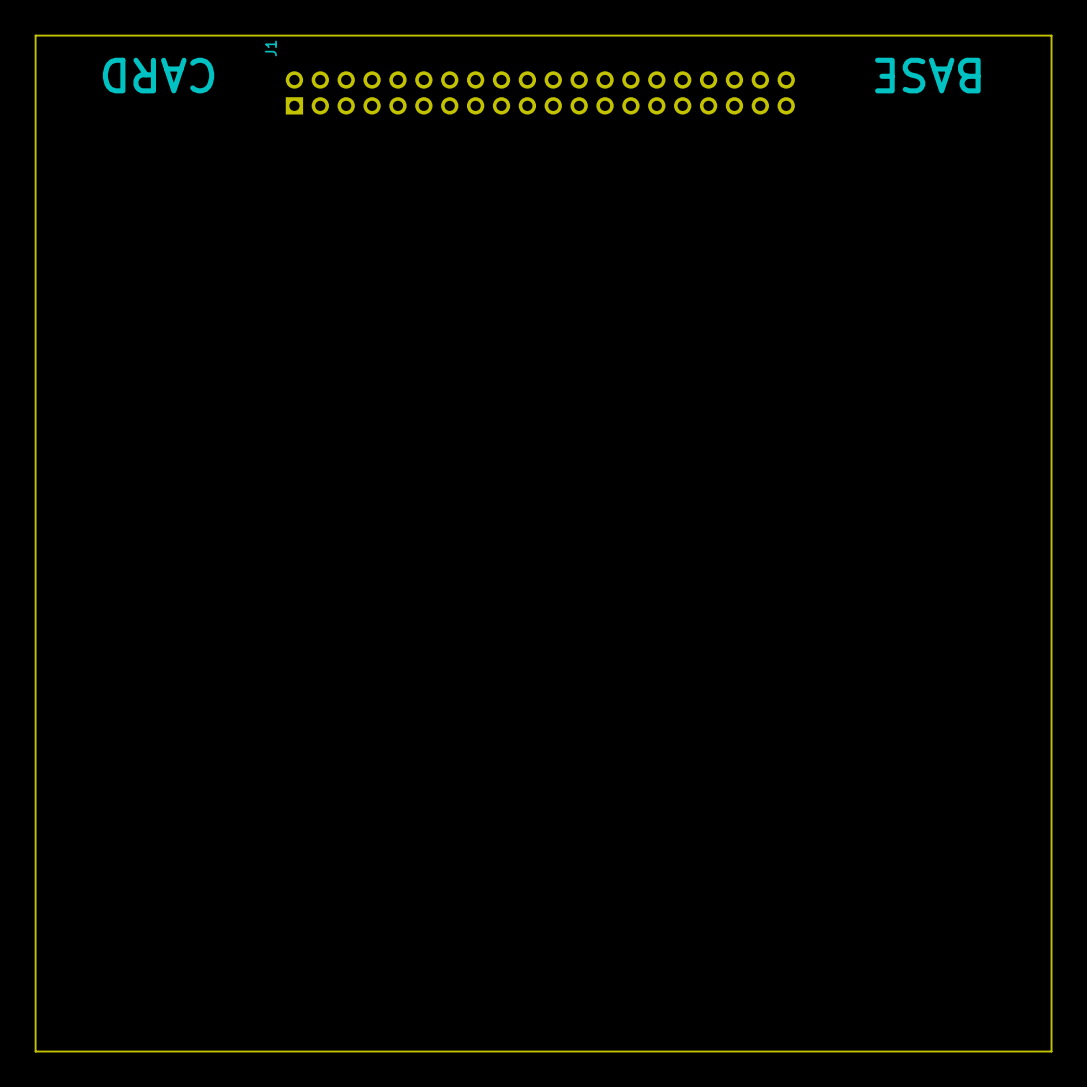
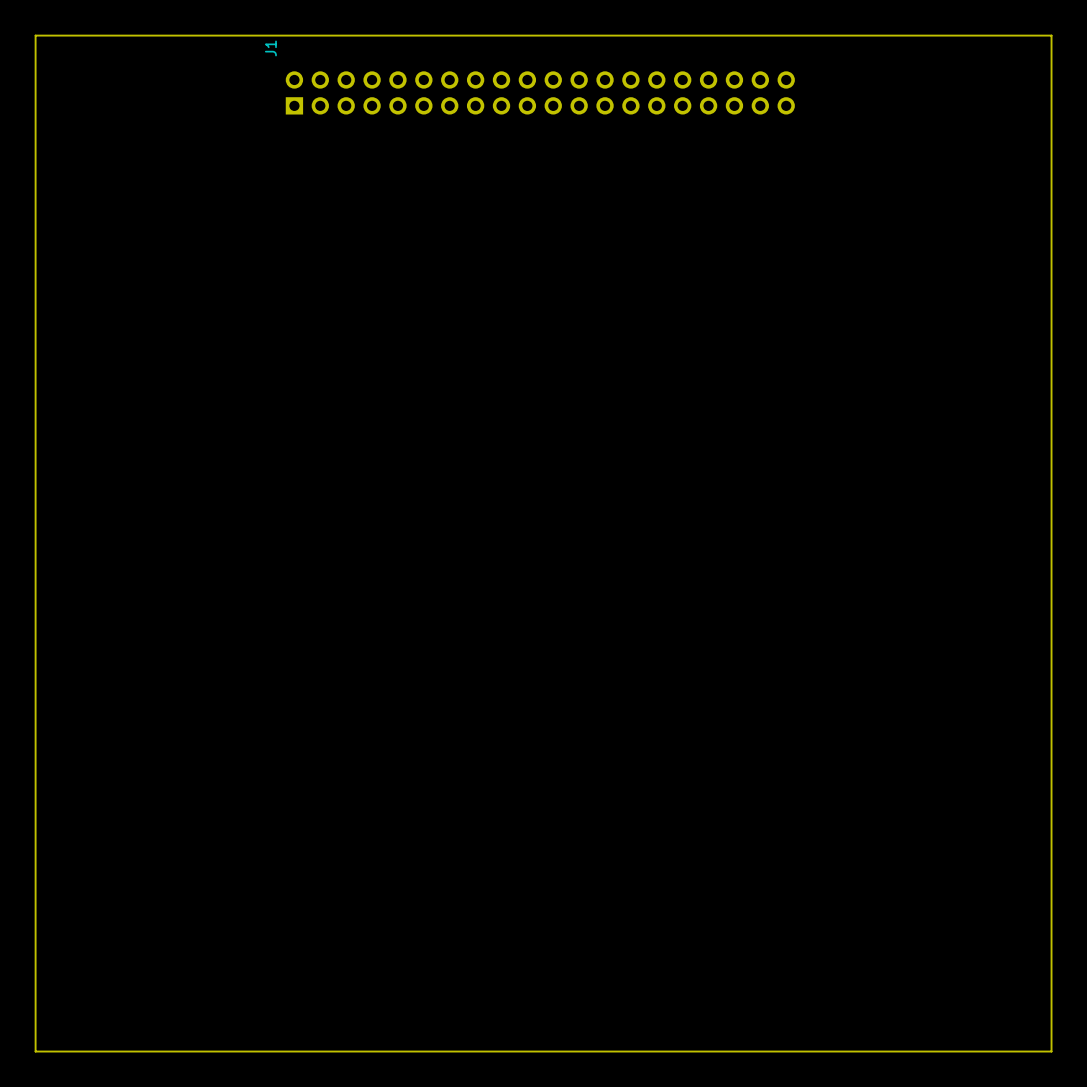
text: CARD (158, 75) -> none
text: BASE (927, 75) -> none

